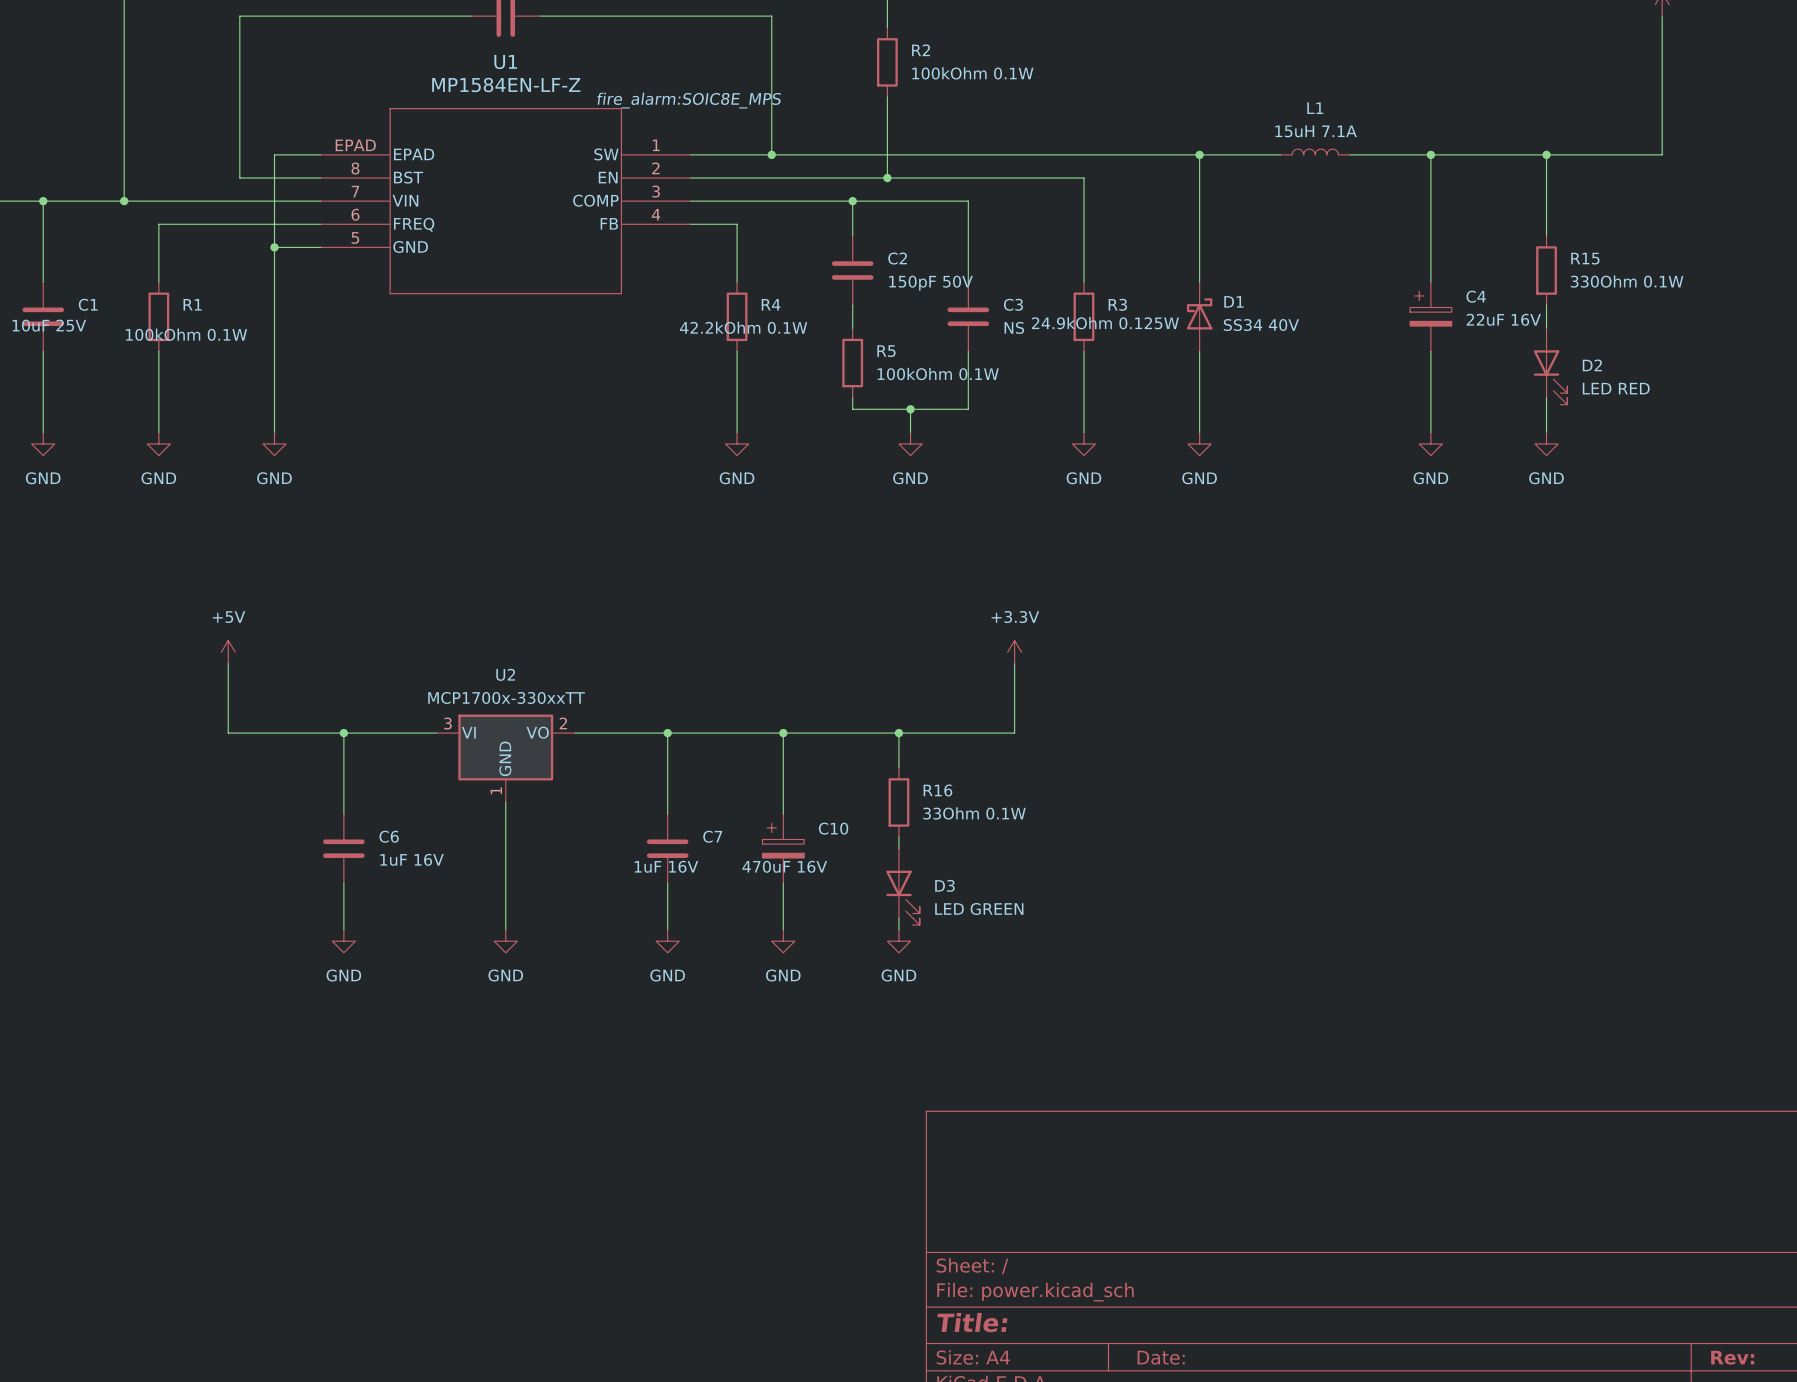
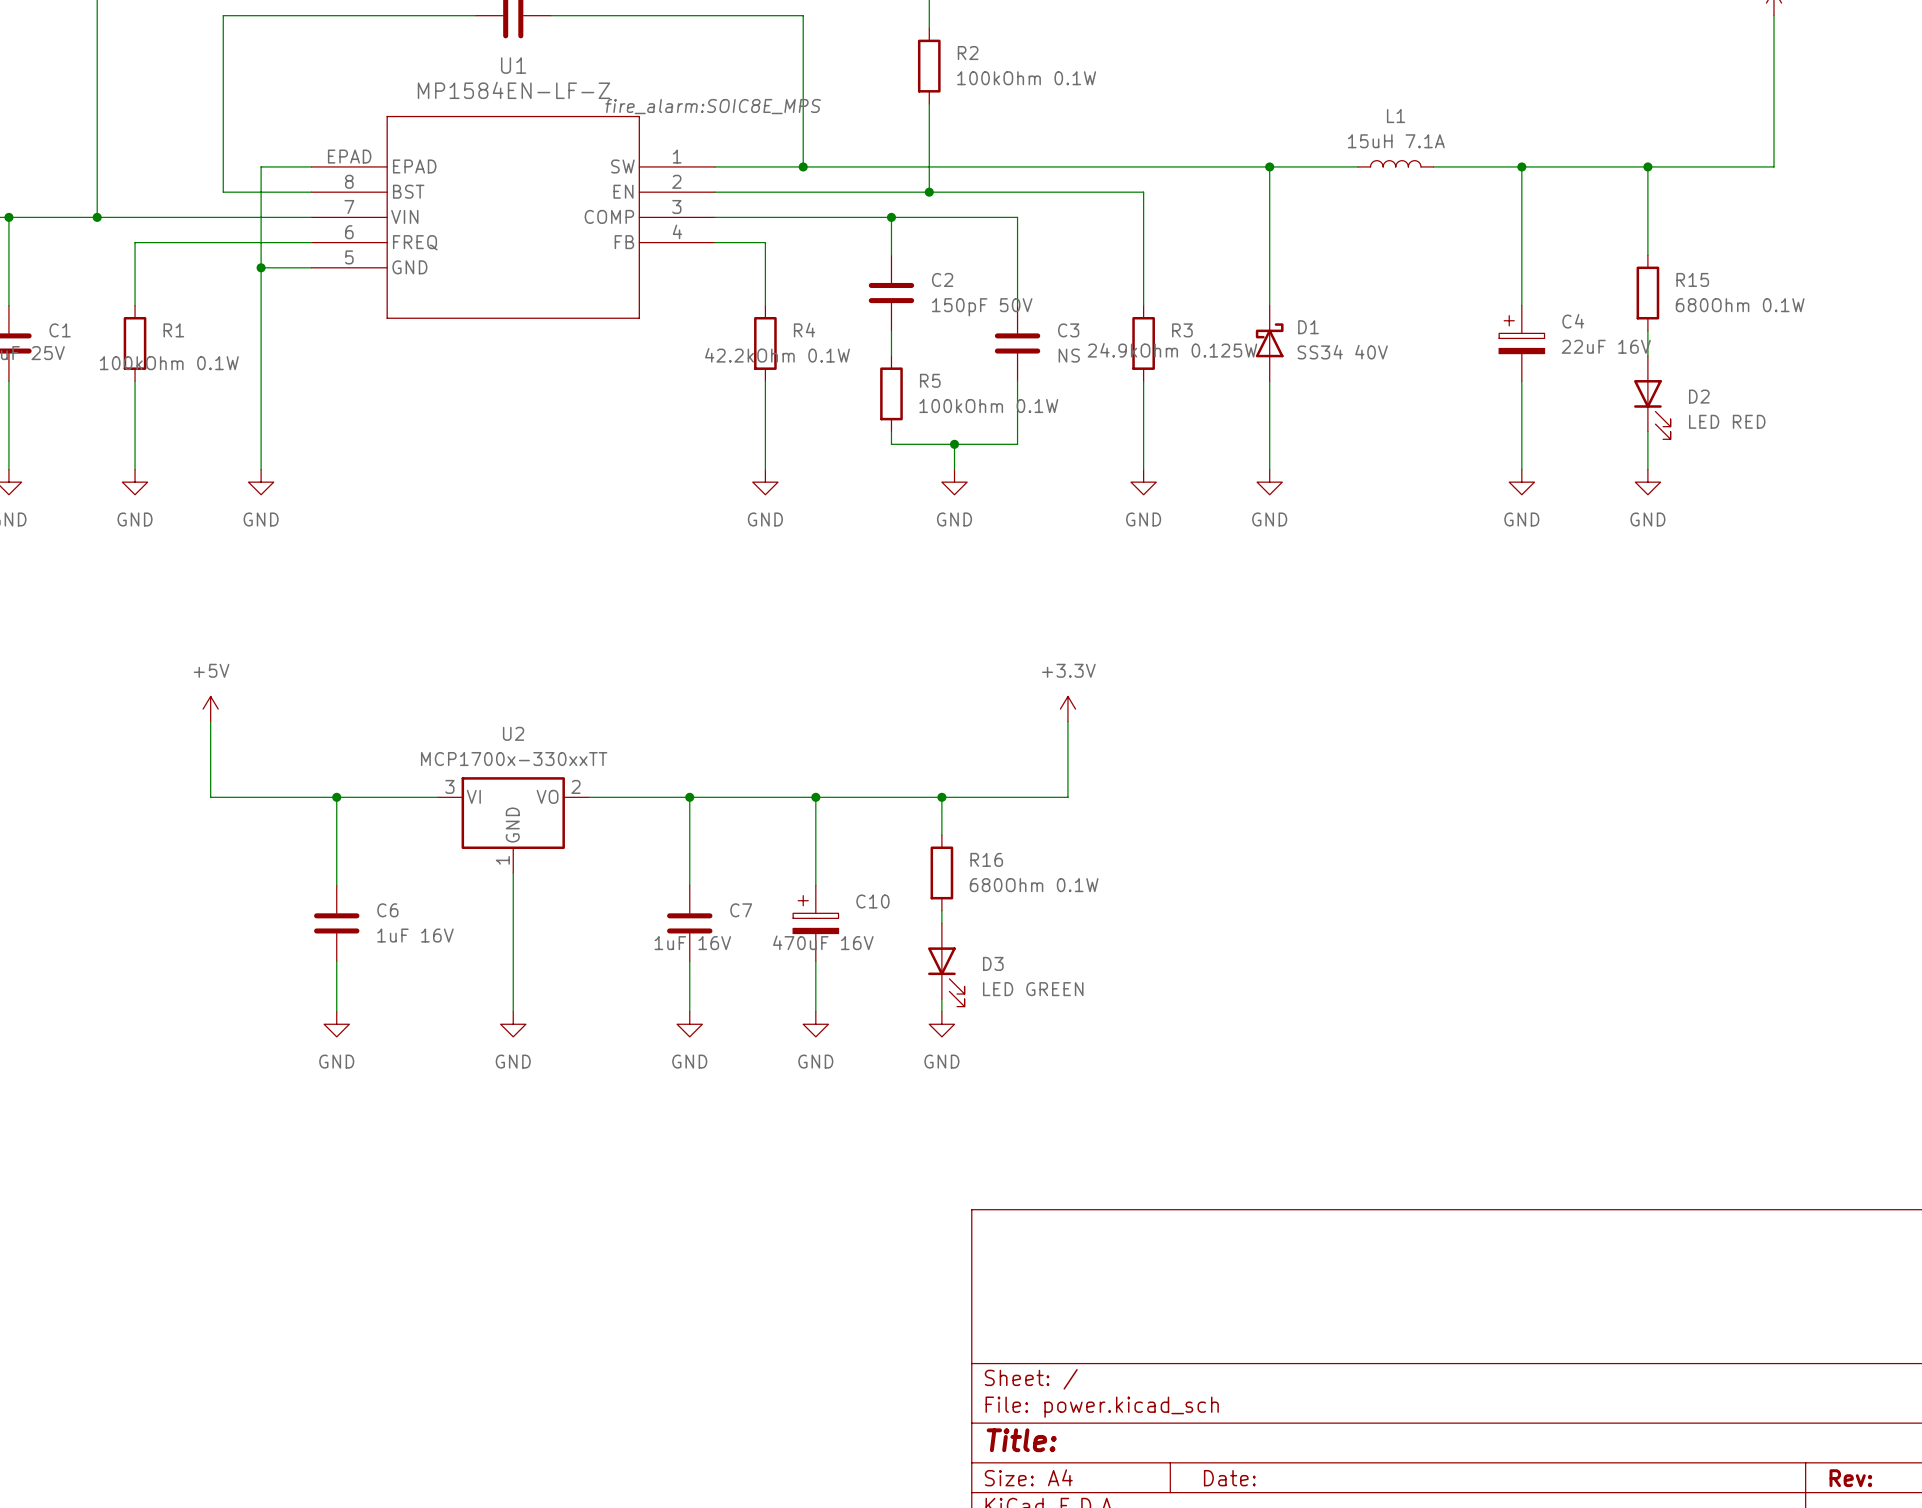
R15 value: 330Ohm 0.1W (1627, 281) -> 680Ohm 0.1W (1740, 305)
R16 value: 33Ohm 0.1W (974, 813) -> 680Ohm 0.1W (1034, 885)

